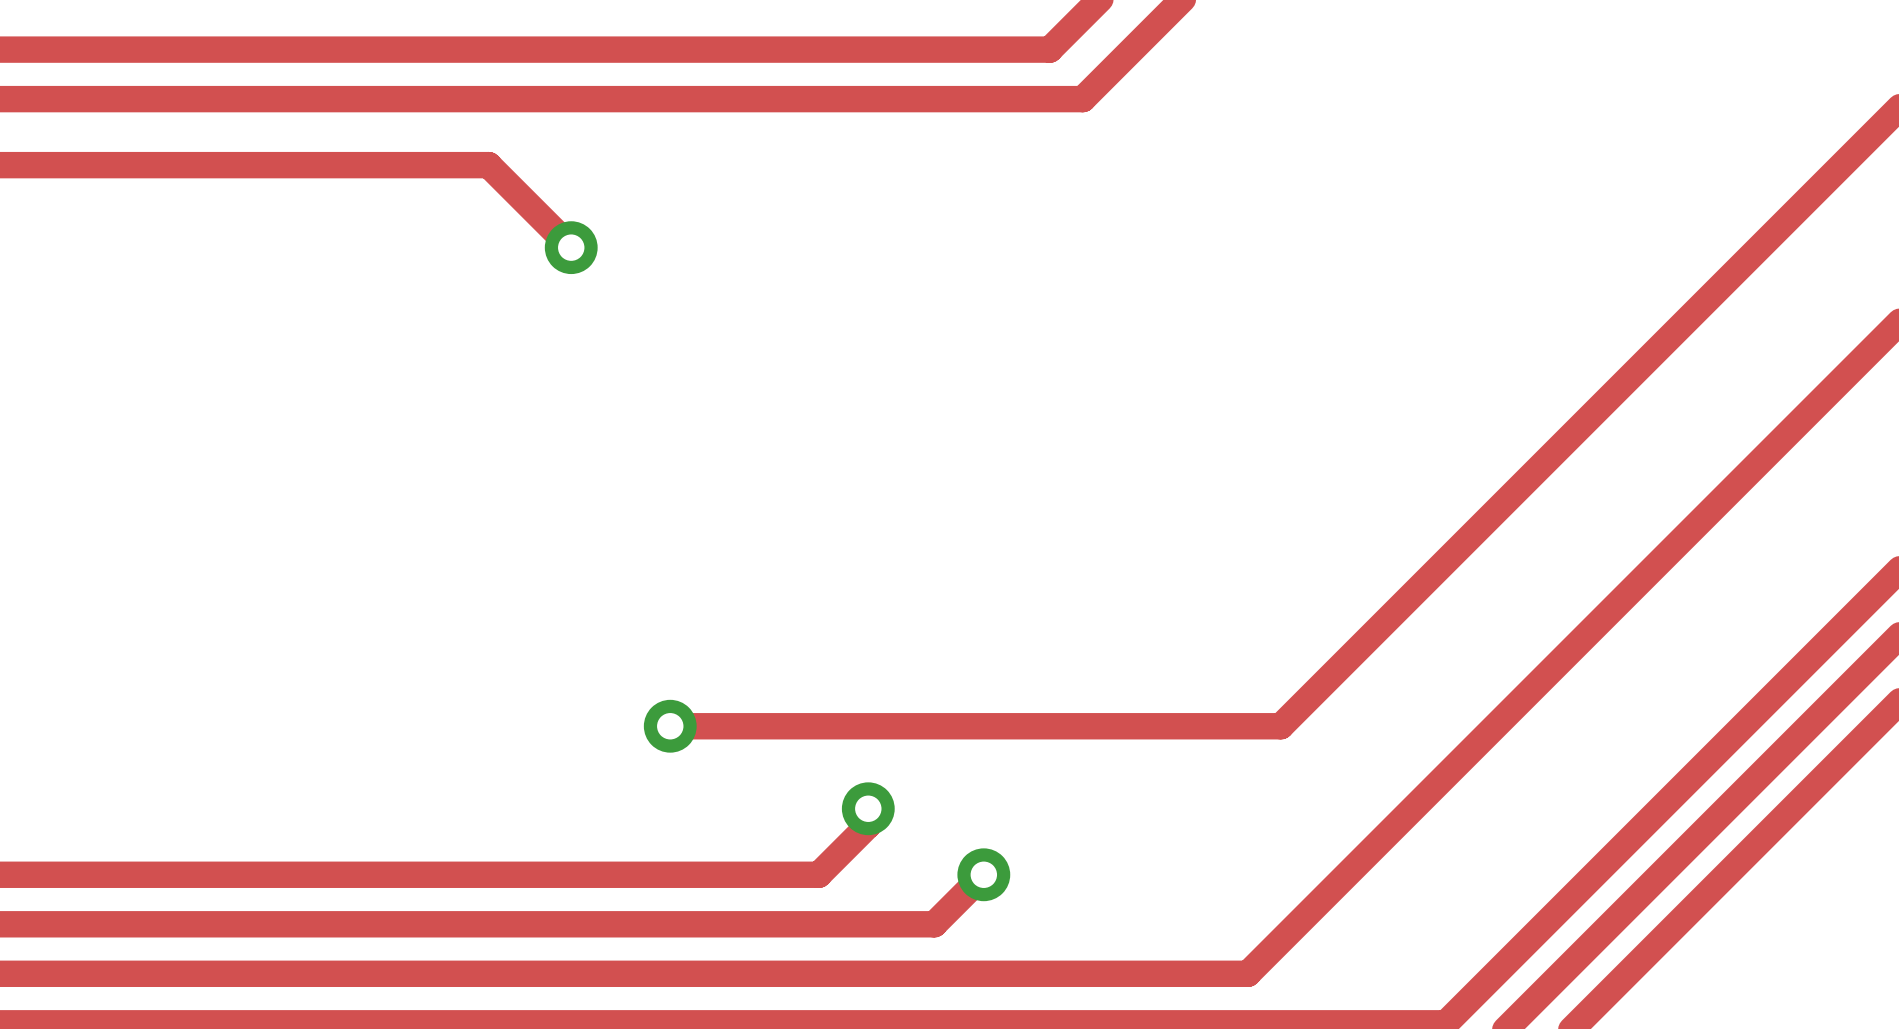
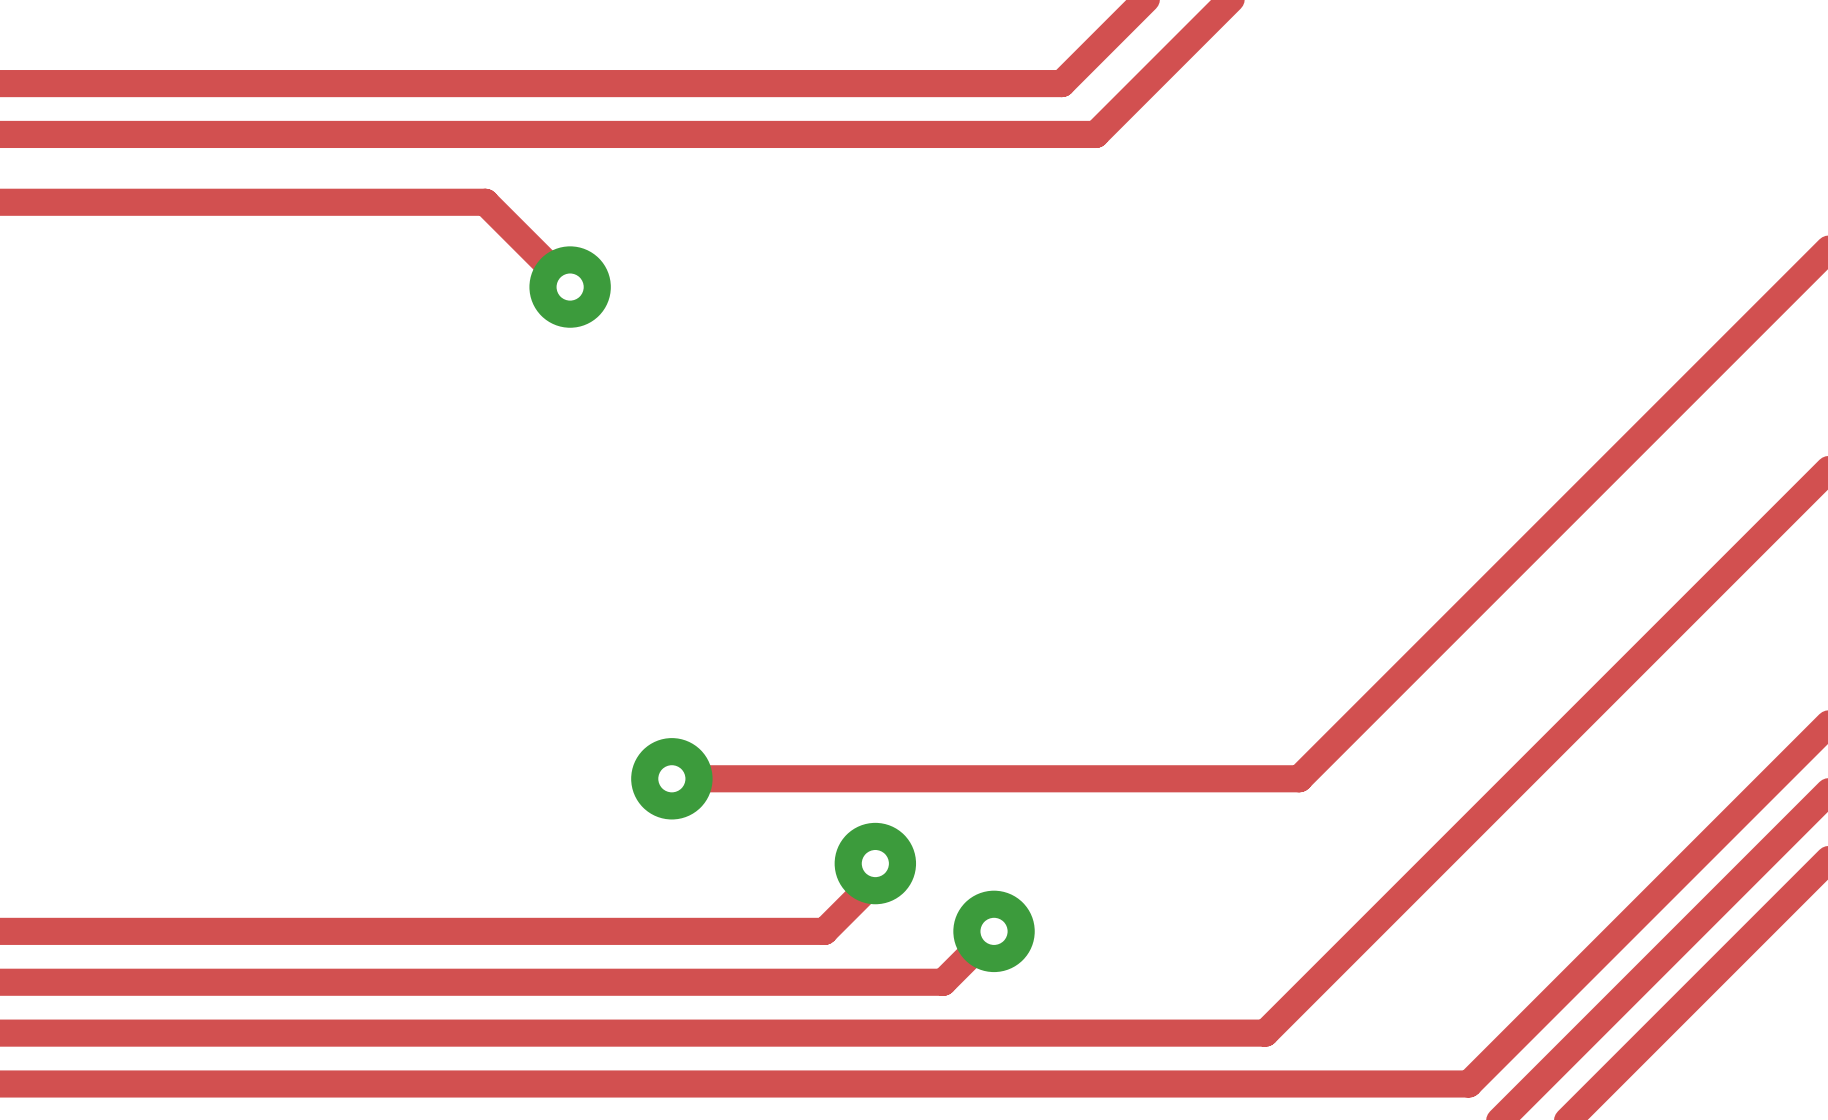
via size: [544, 221, 598, 275] -> [529, 246, 611, 328]
via size: [643, 699, 697, 753] -> [631, 738, 713, 820]
via size: [841, 782, 895, 836] -> [834, 822, 917, 905]
via size: [957, 848, 1011, 902] -> [953, 890, 1035, 973]

